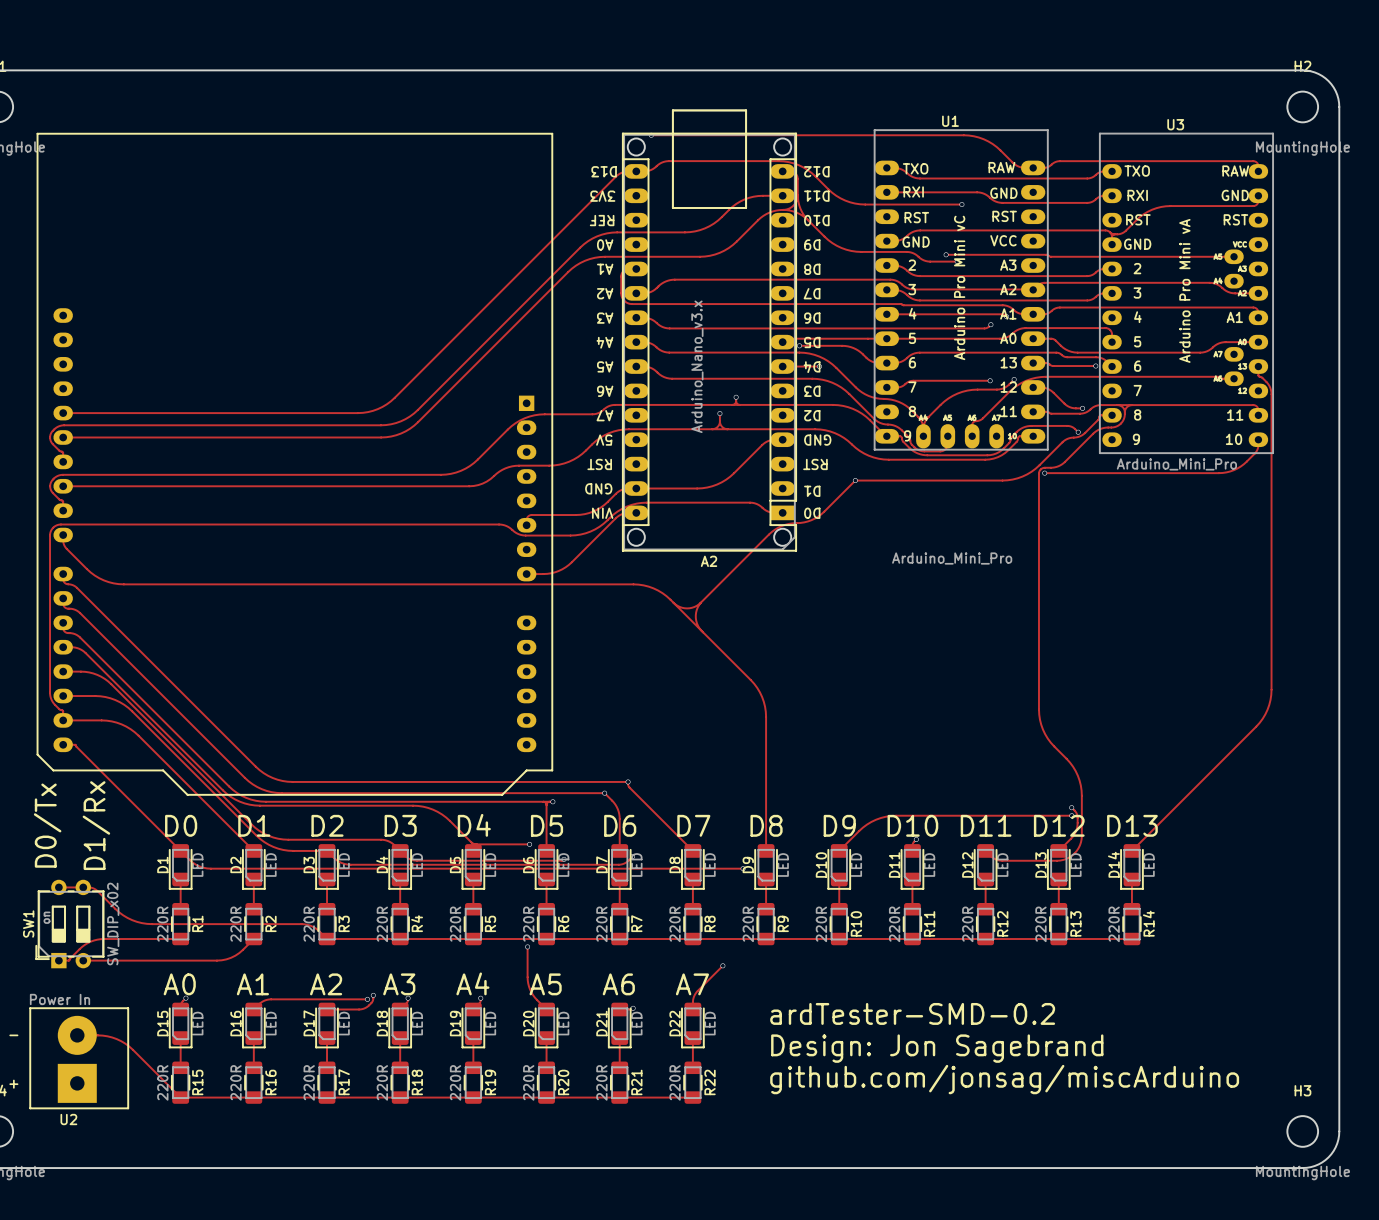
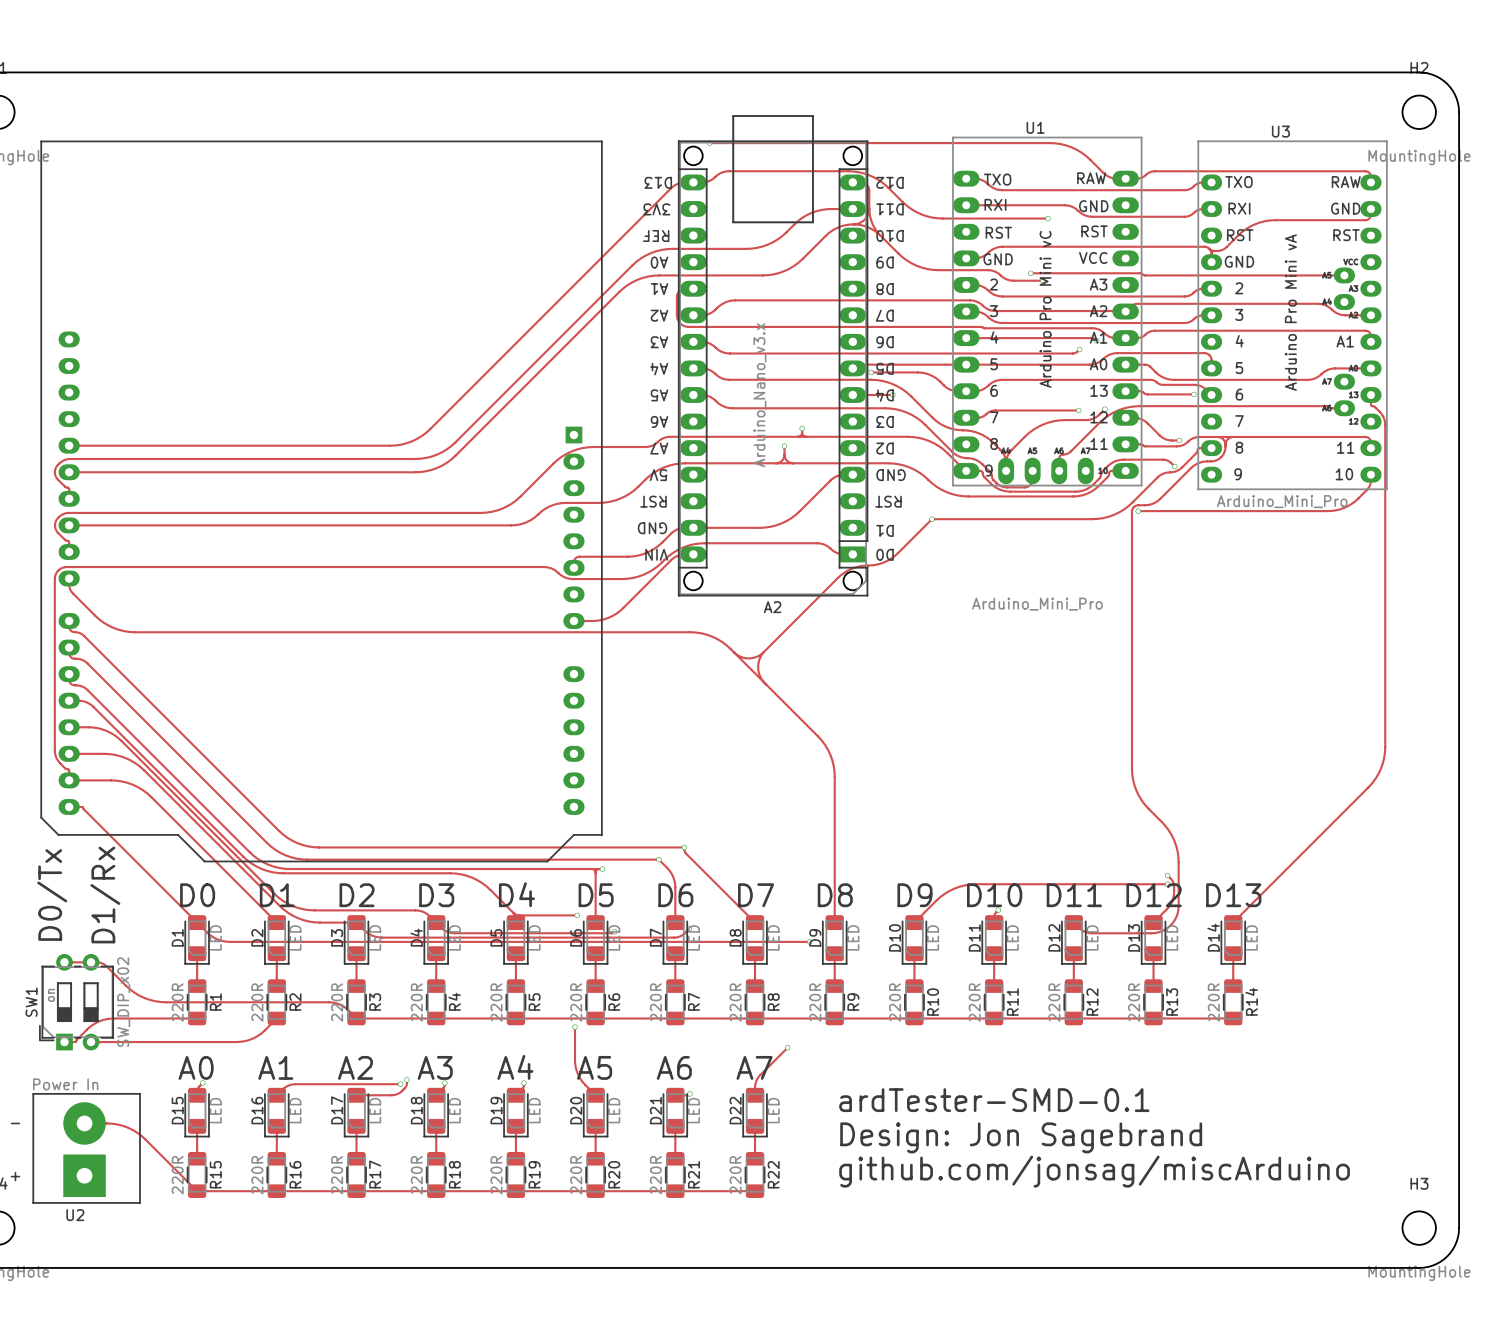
text: ardTester-SMD-0.2 (912, 1013) -> ardTester-SMD-0.1 (994, 1100)

